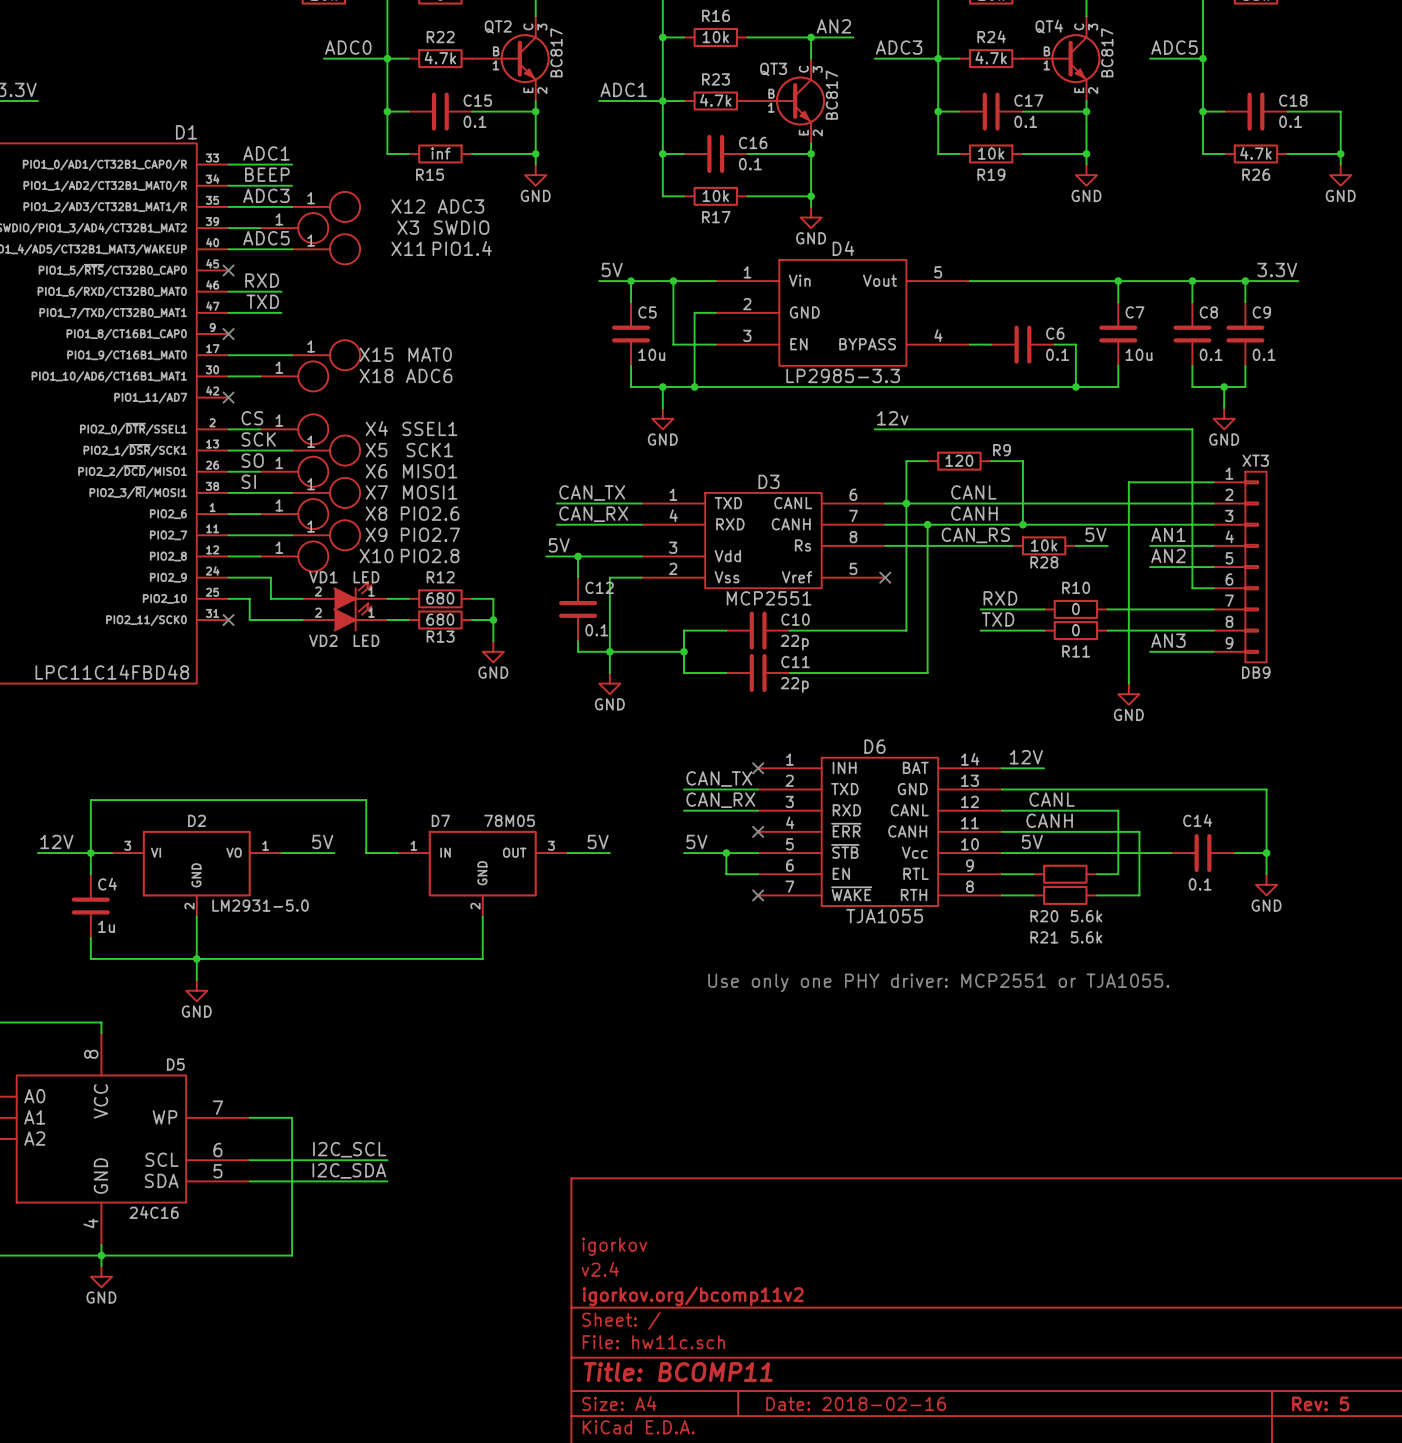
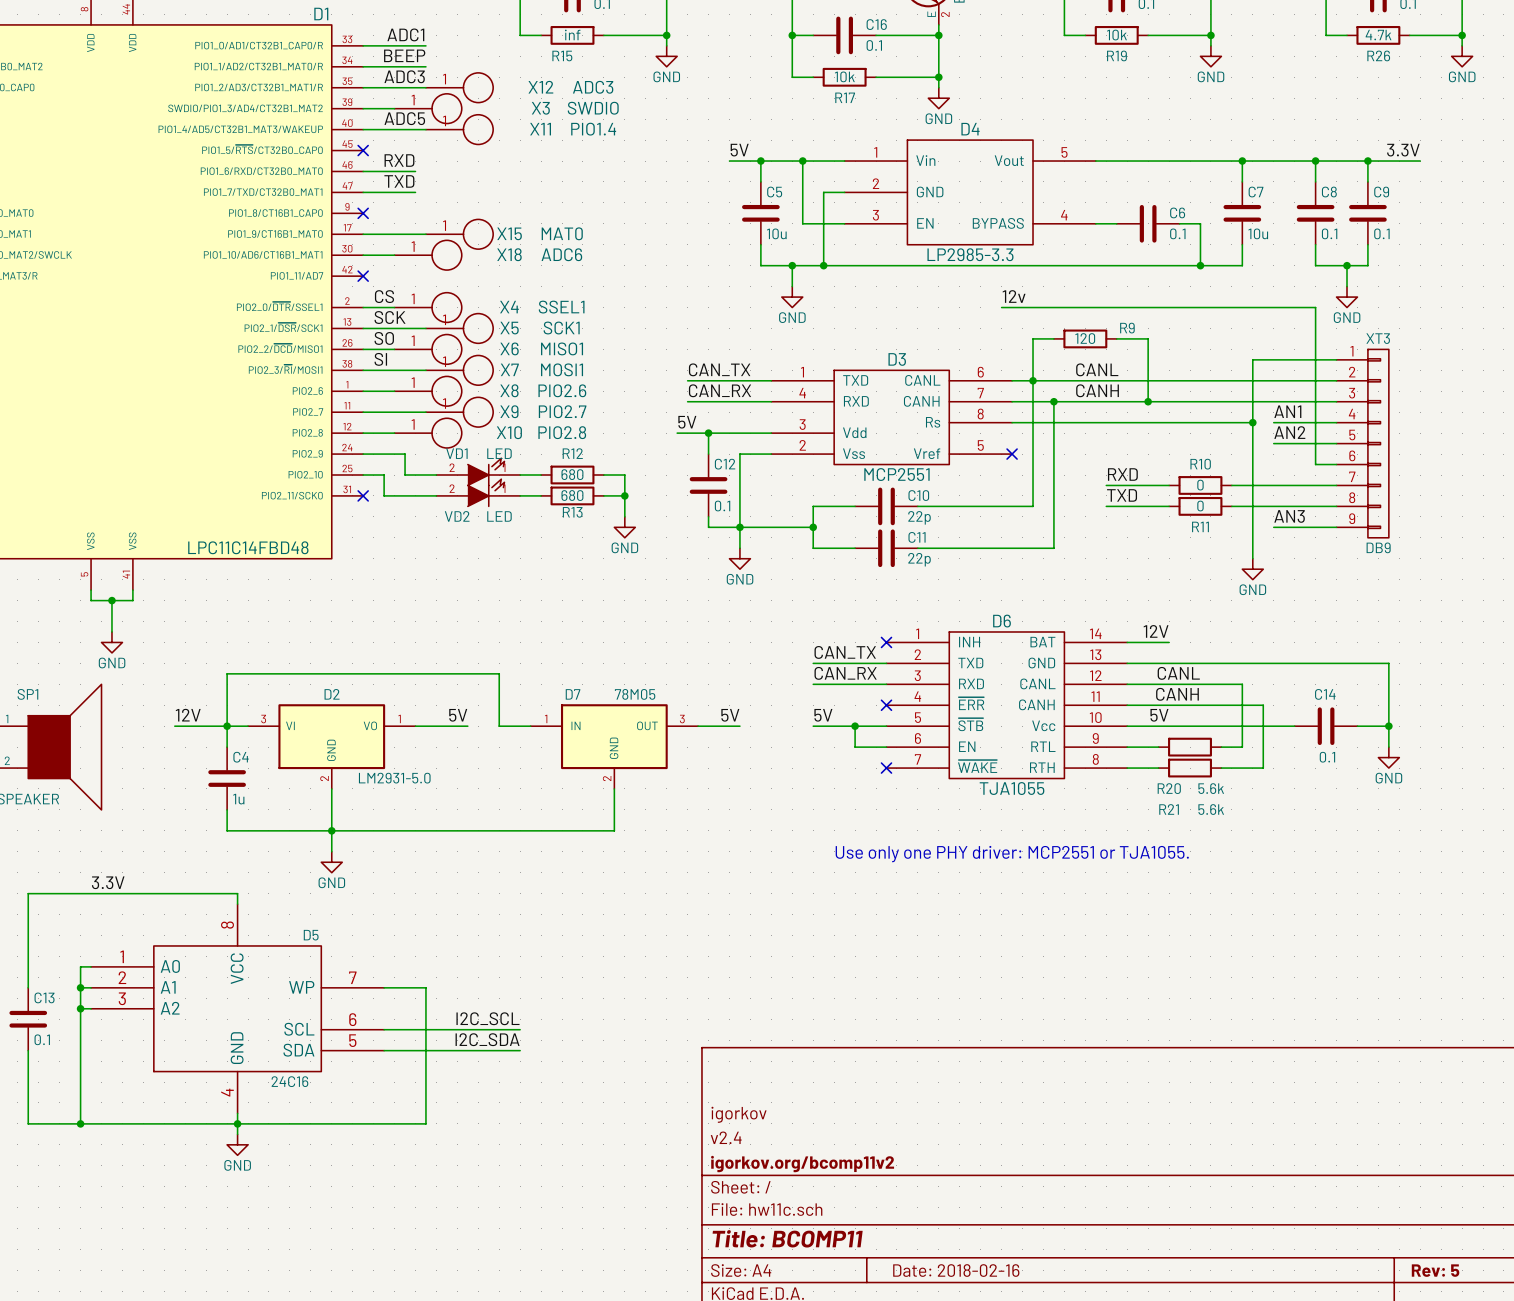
label: 5V (1095, 534) -> none
label: CAN_RS (975, 535) -> none
wire: none -> (1137, 422) (1200, 422)
R28: 10k (1044, 545) -> none
wire: none -> (1231, 422) (1252, 422)
junction: none -> (1252, 422)

